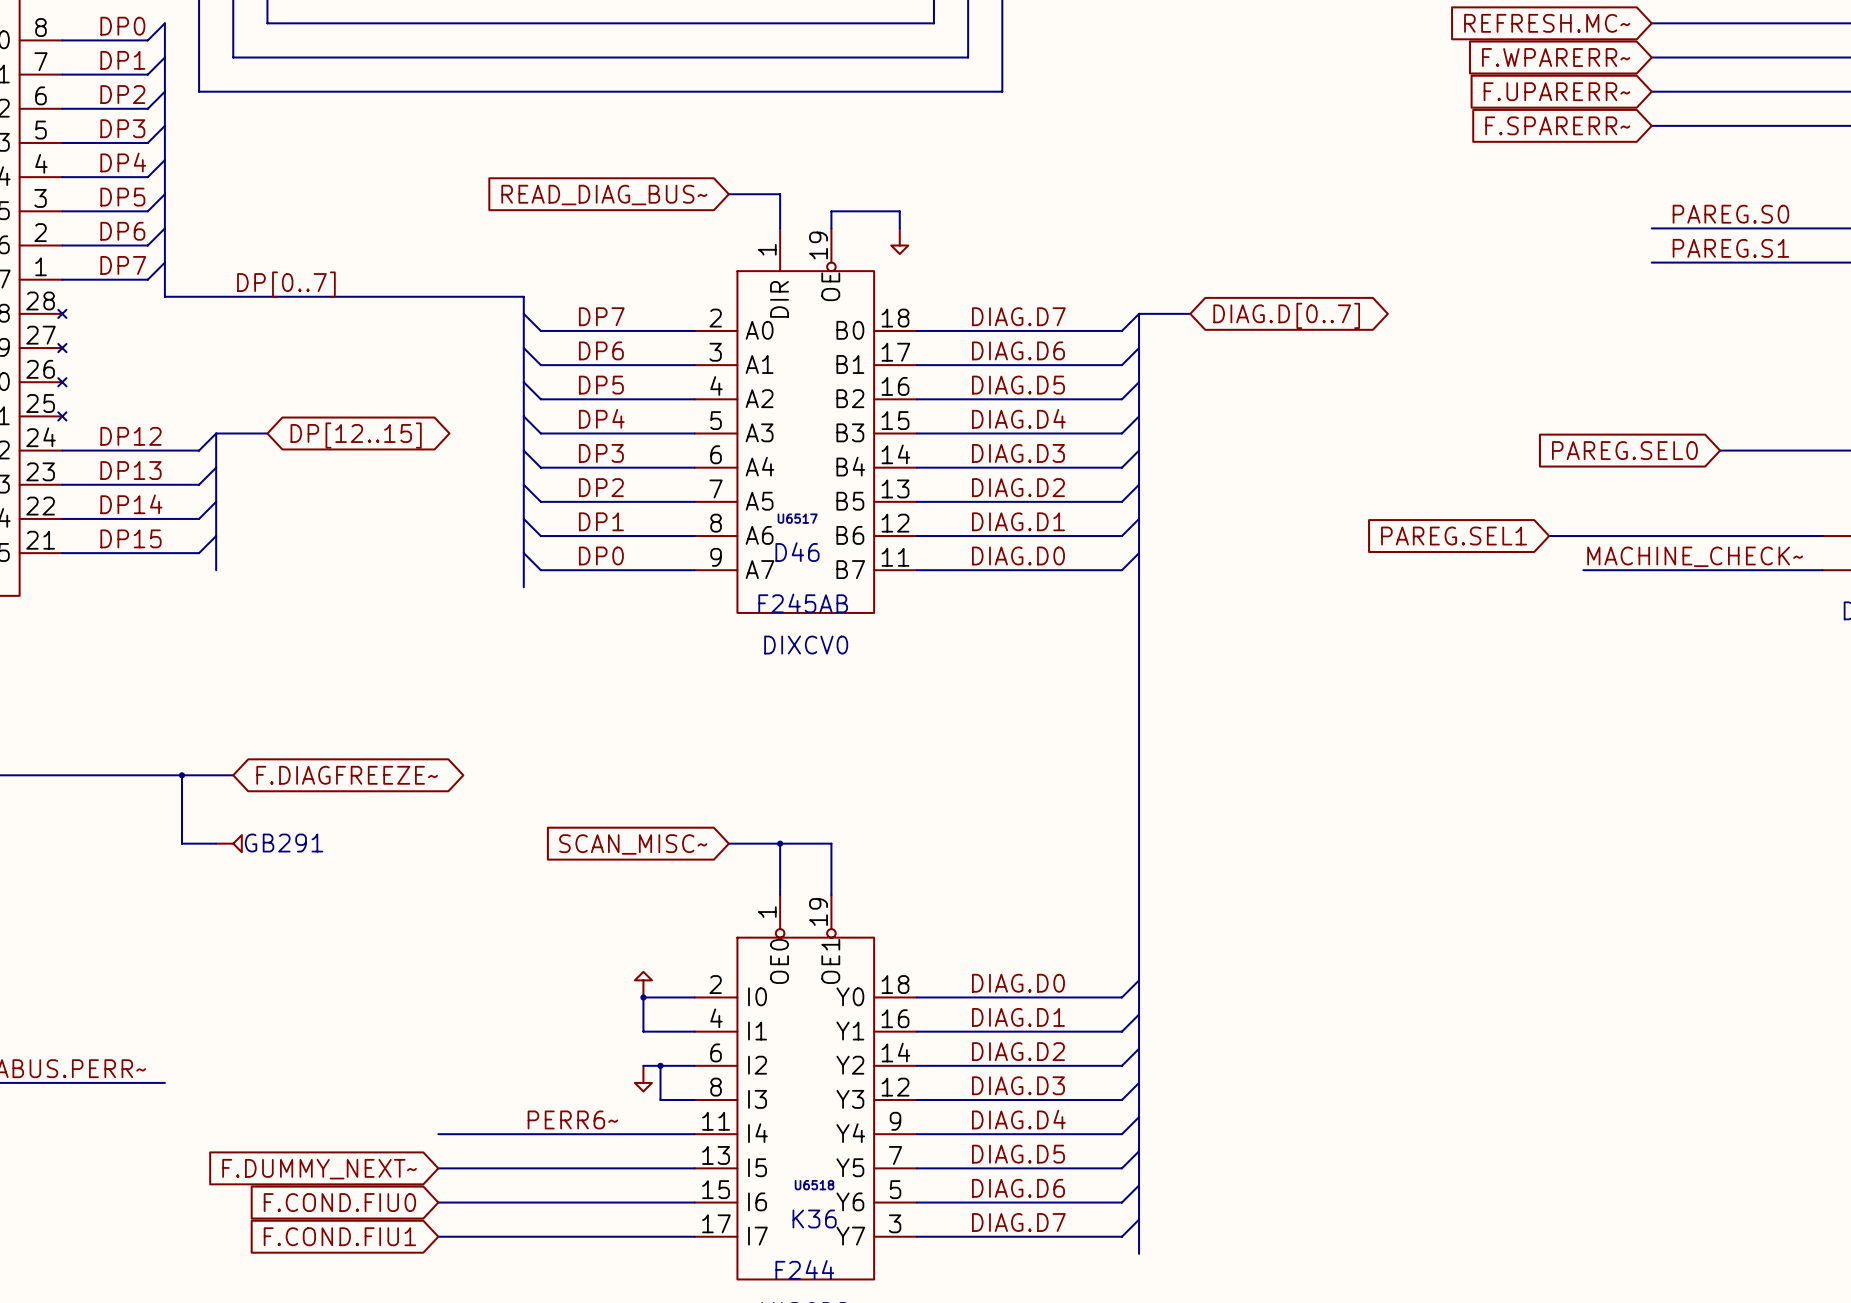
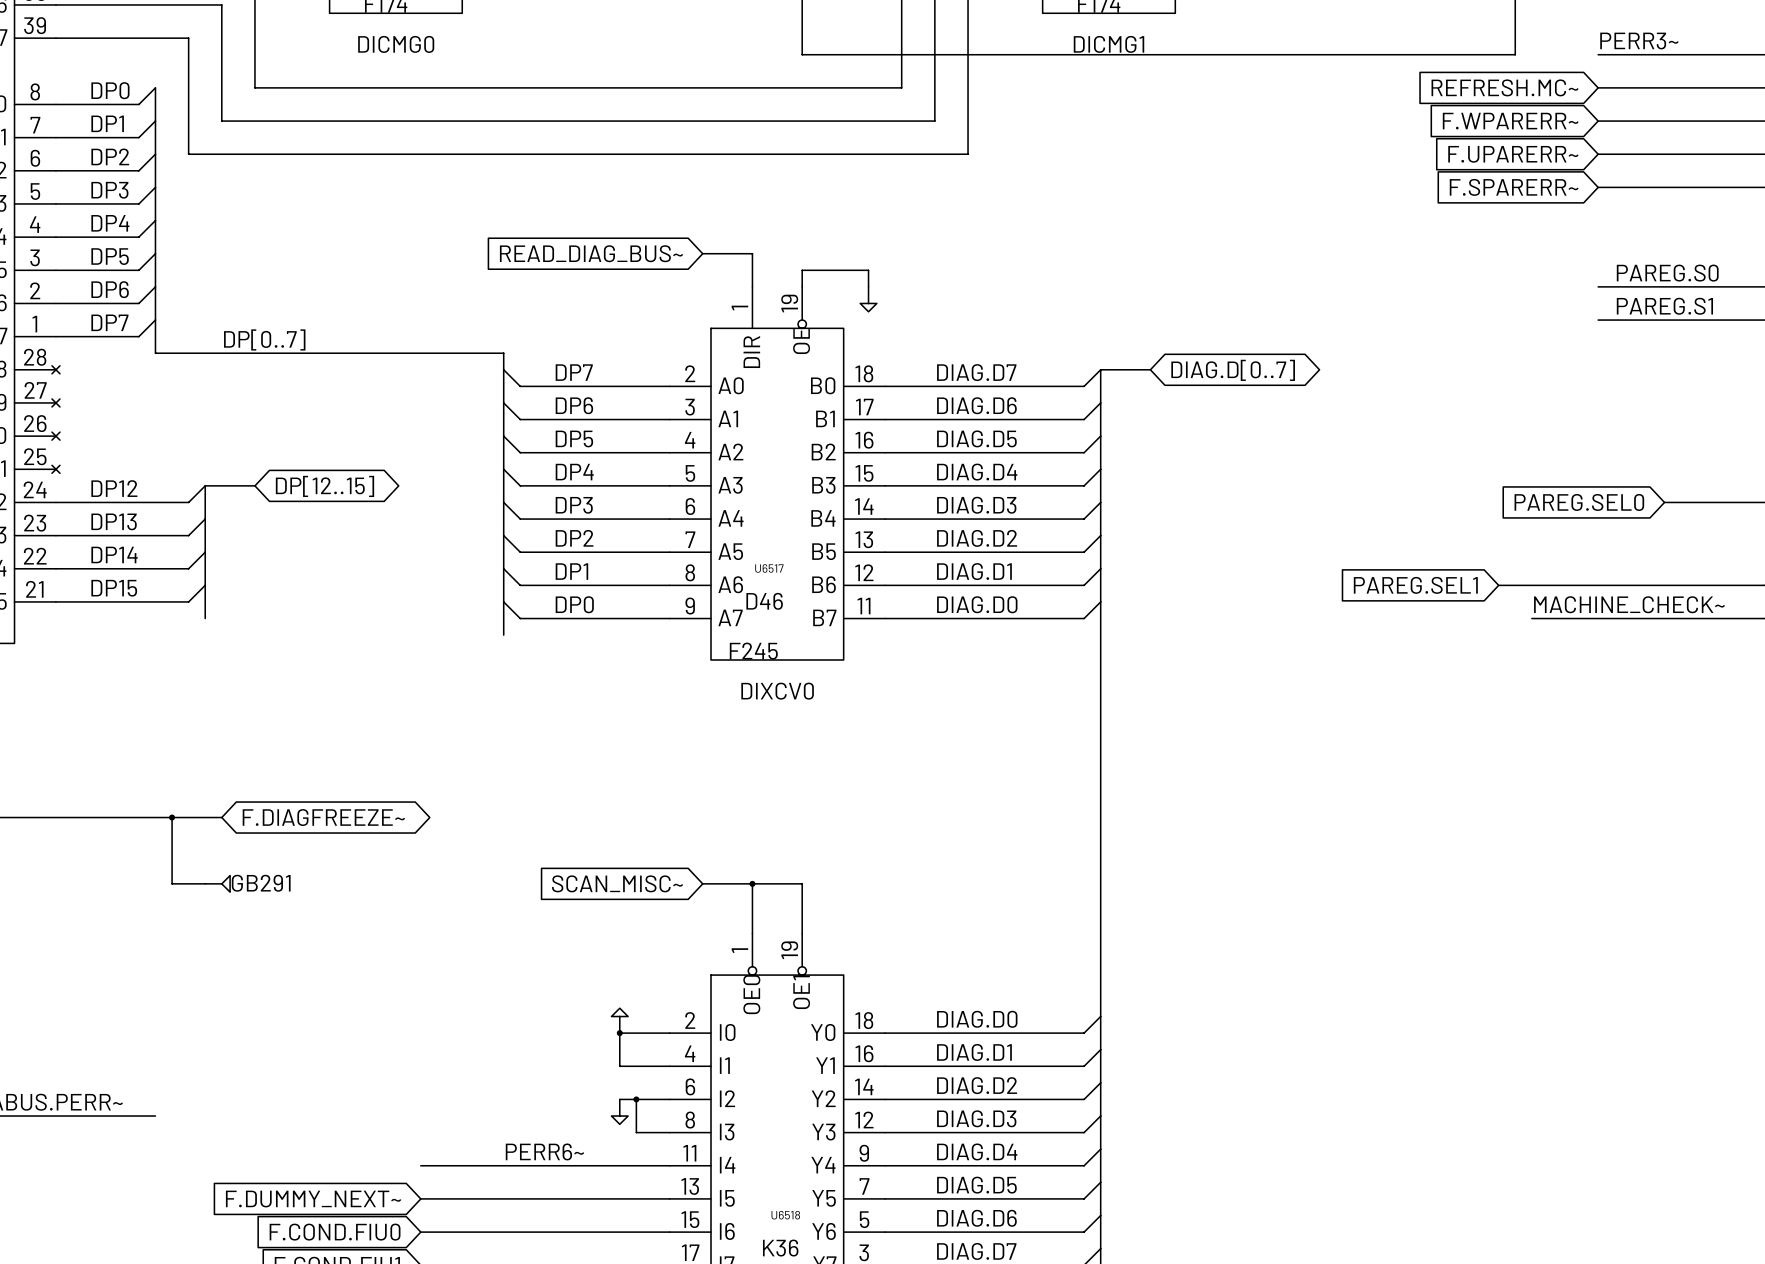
U6517 value: F245AB (803, 603) -> F245 (753, 651)

